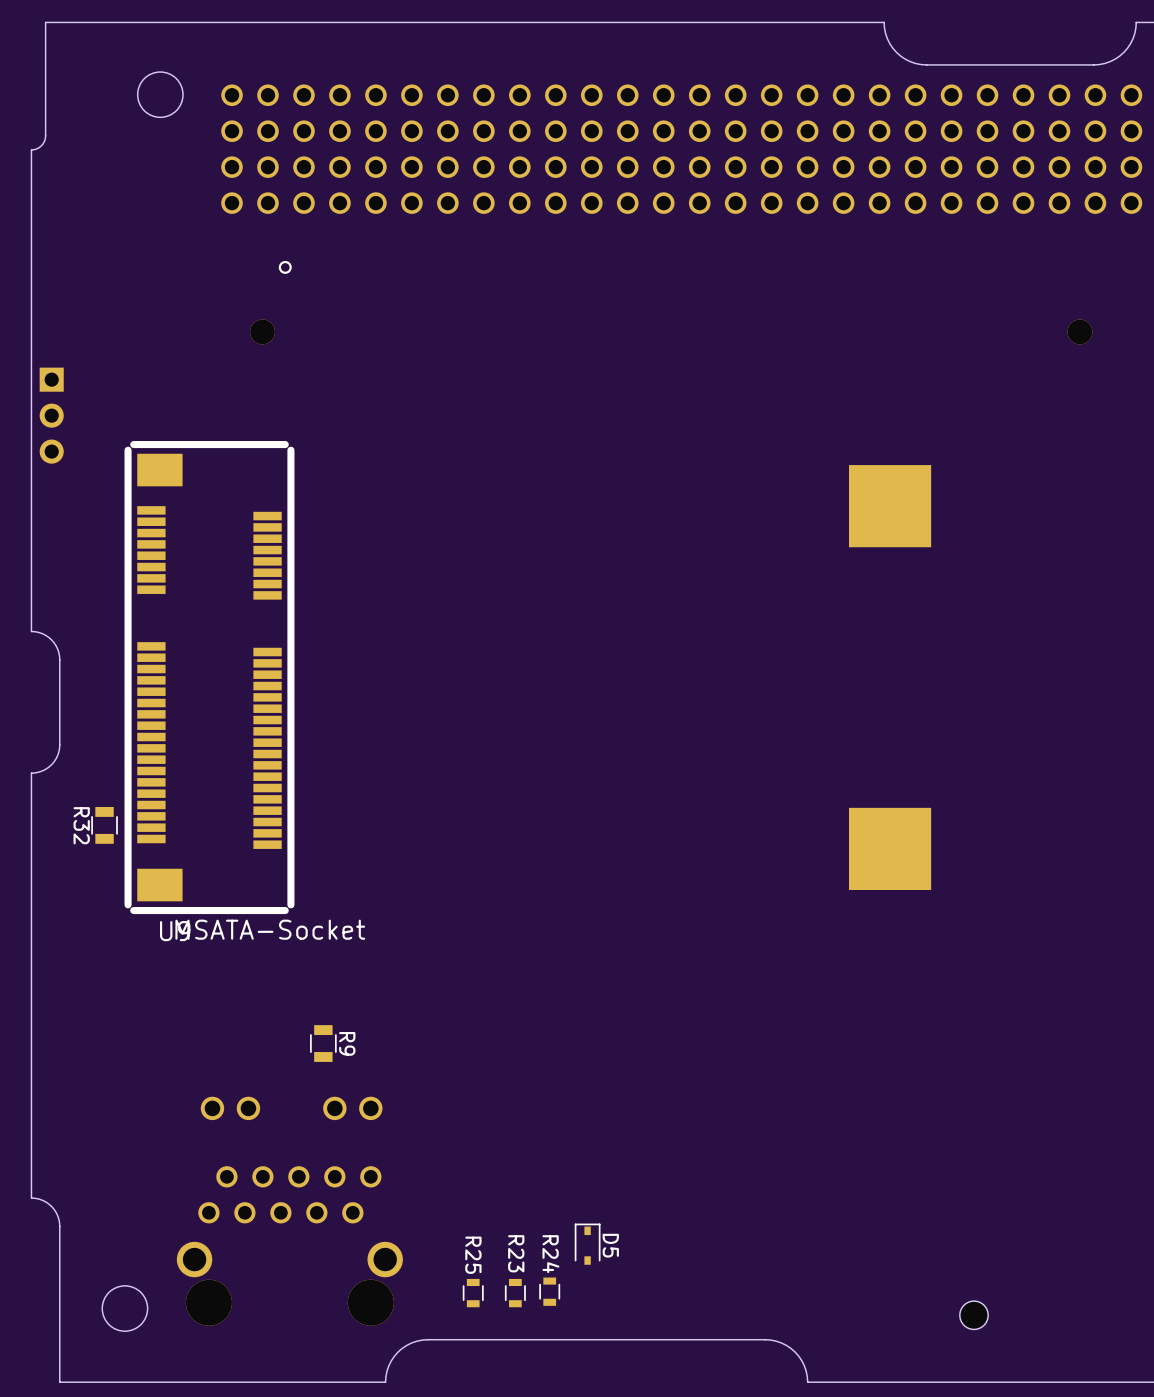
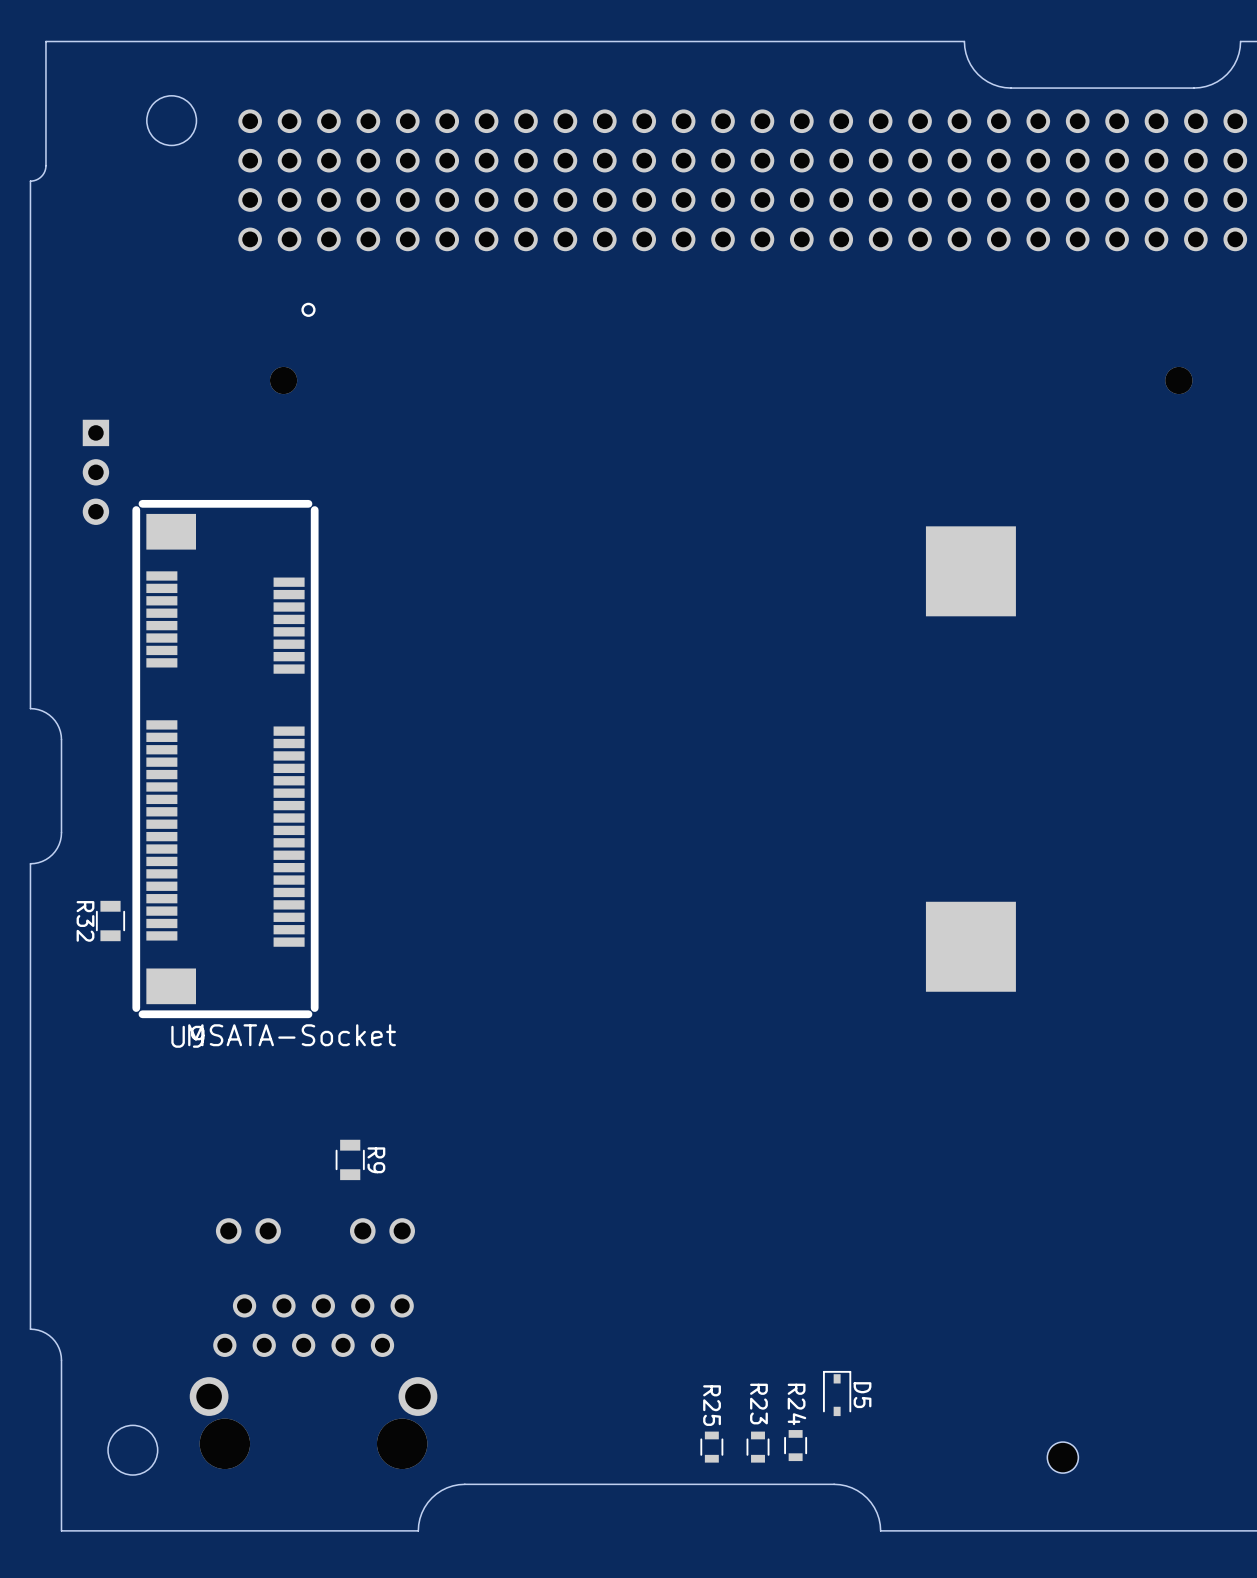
part position: (51, 415) -> (95, 472)
D5 position: (587, 1244) -> (837, 1393)
R24 position: (549, 1291) -> (795, 1445)
R25 position: (473, 1293) -> (711, 1447)
R23 position: (515, 1293) -> (758, 1447)

